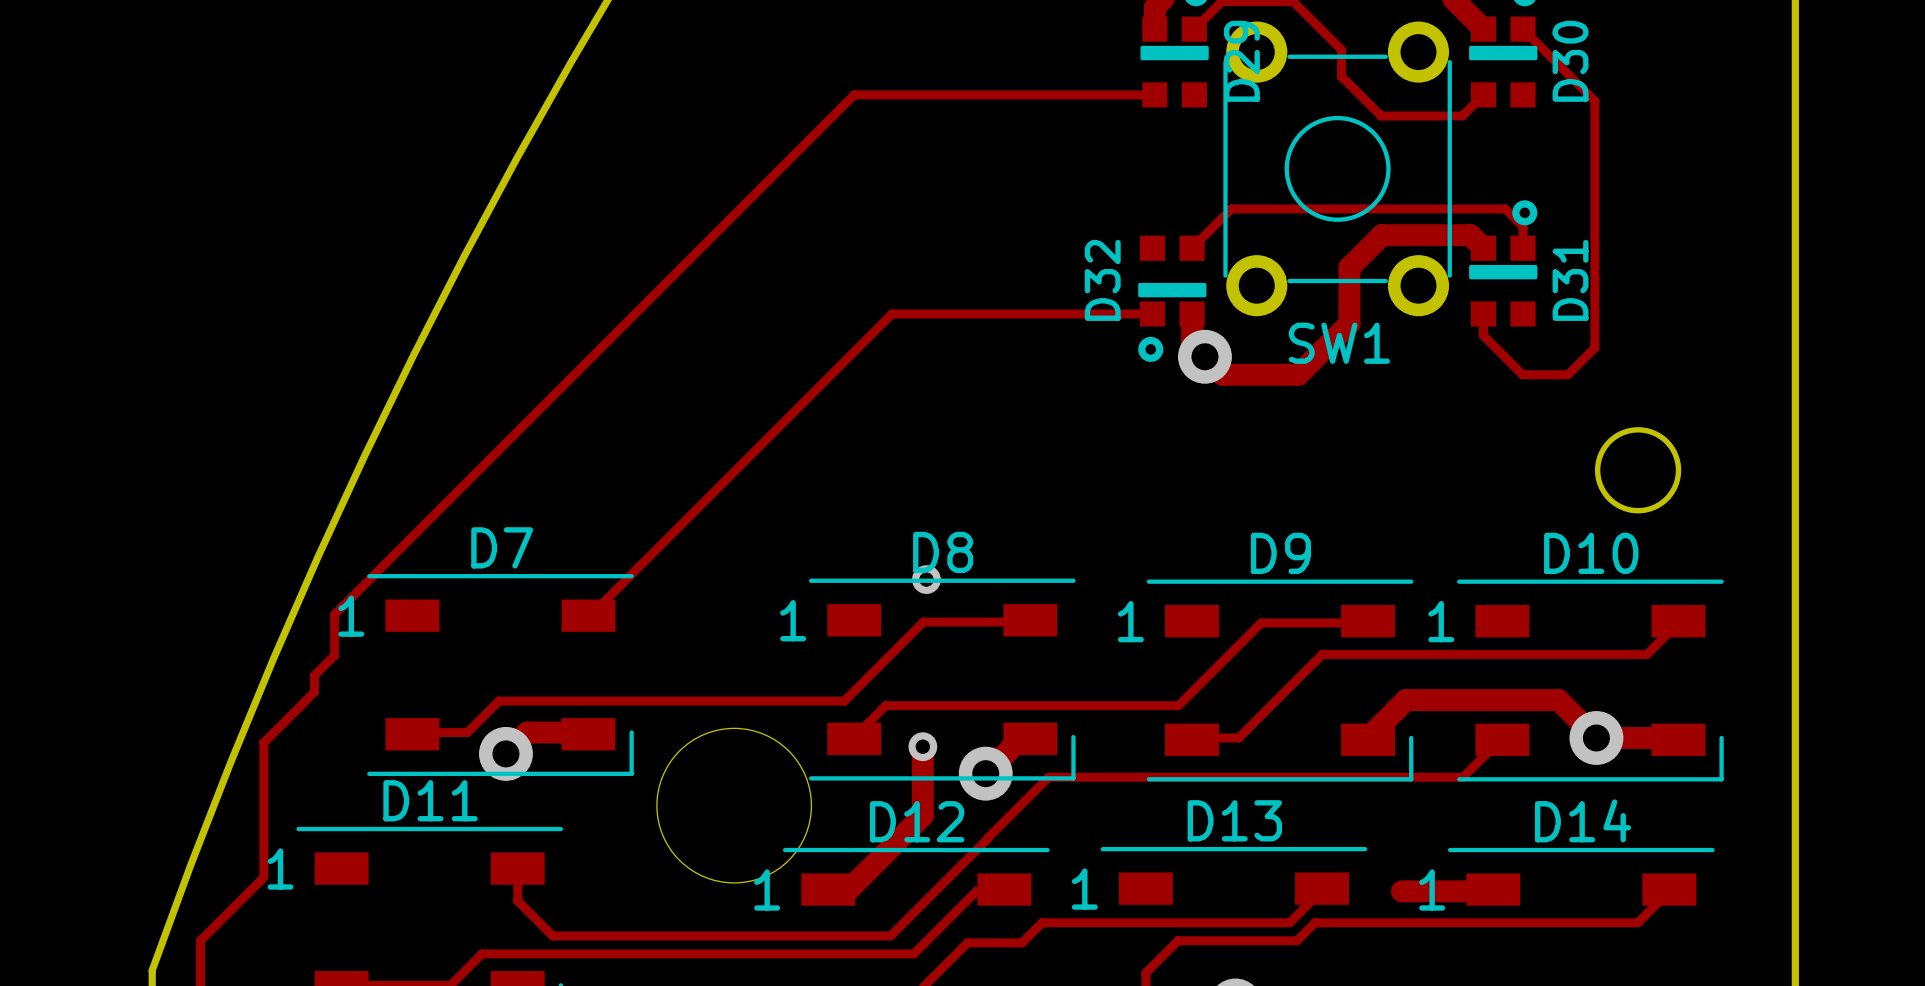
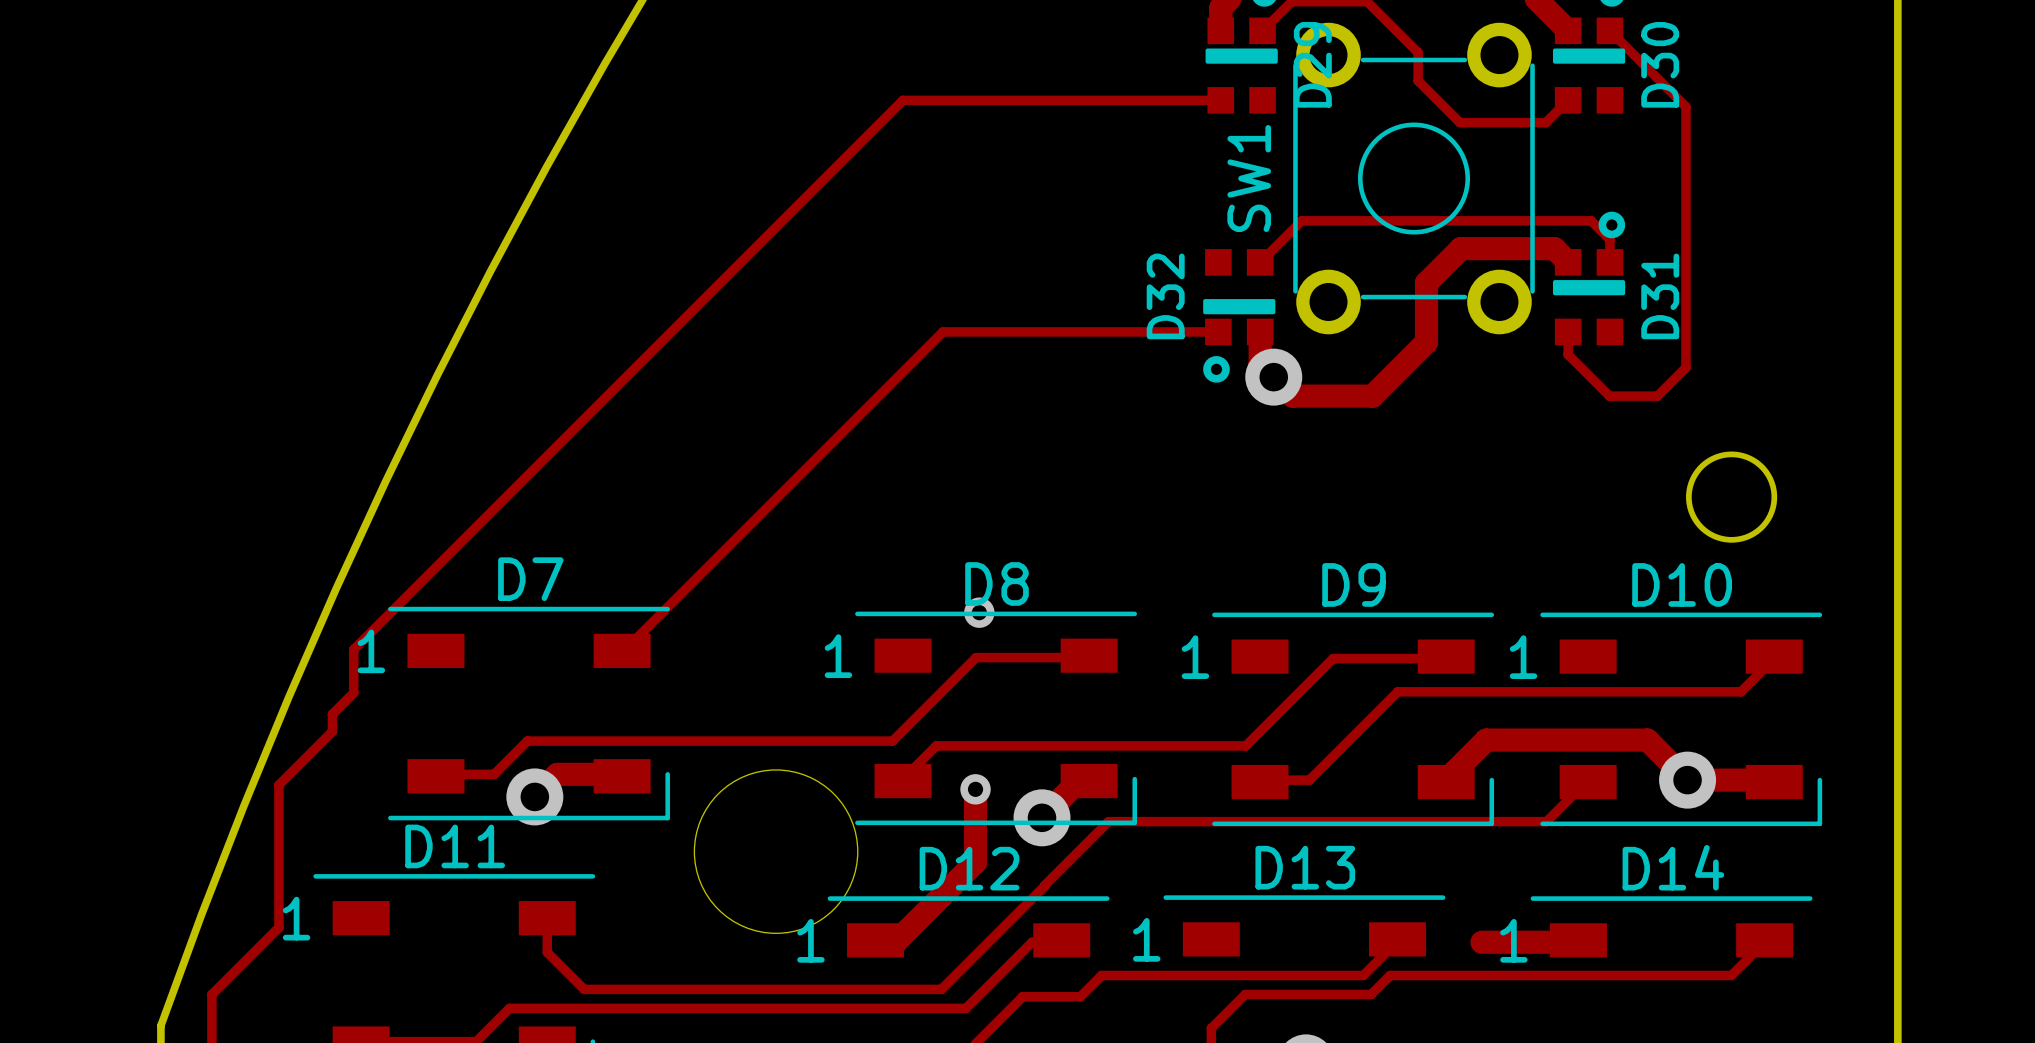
SW1 name rotation: 0° (1339, 343) -> 90° counterclockwise (1249, 178)
SW1 name position: SW1 (1339, 343) -> SW1 (1249, 178)

